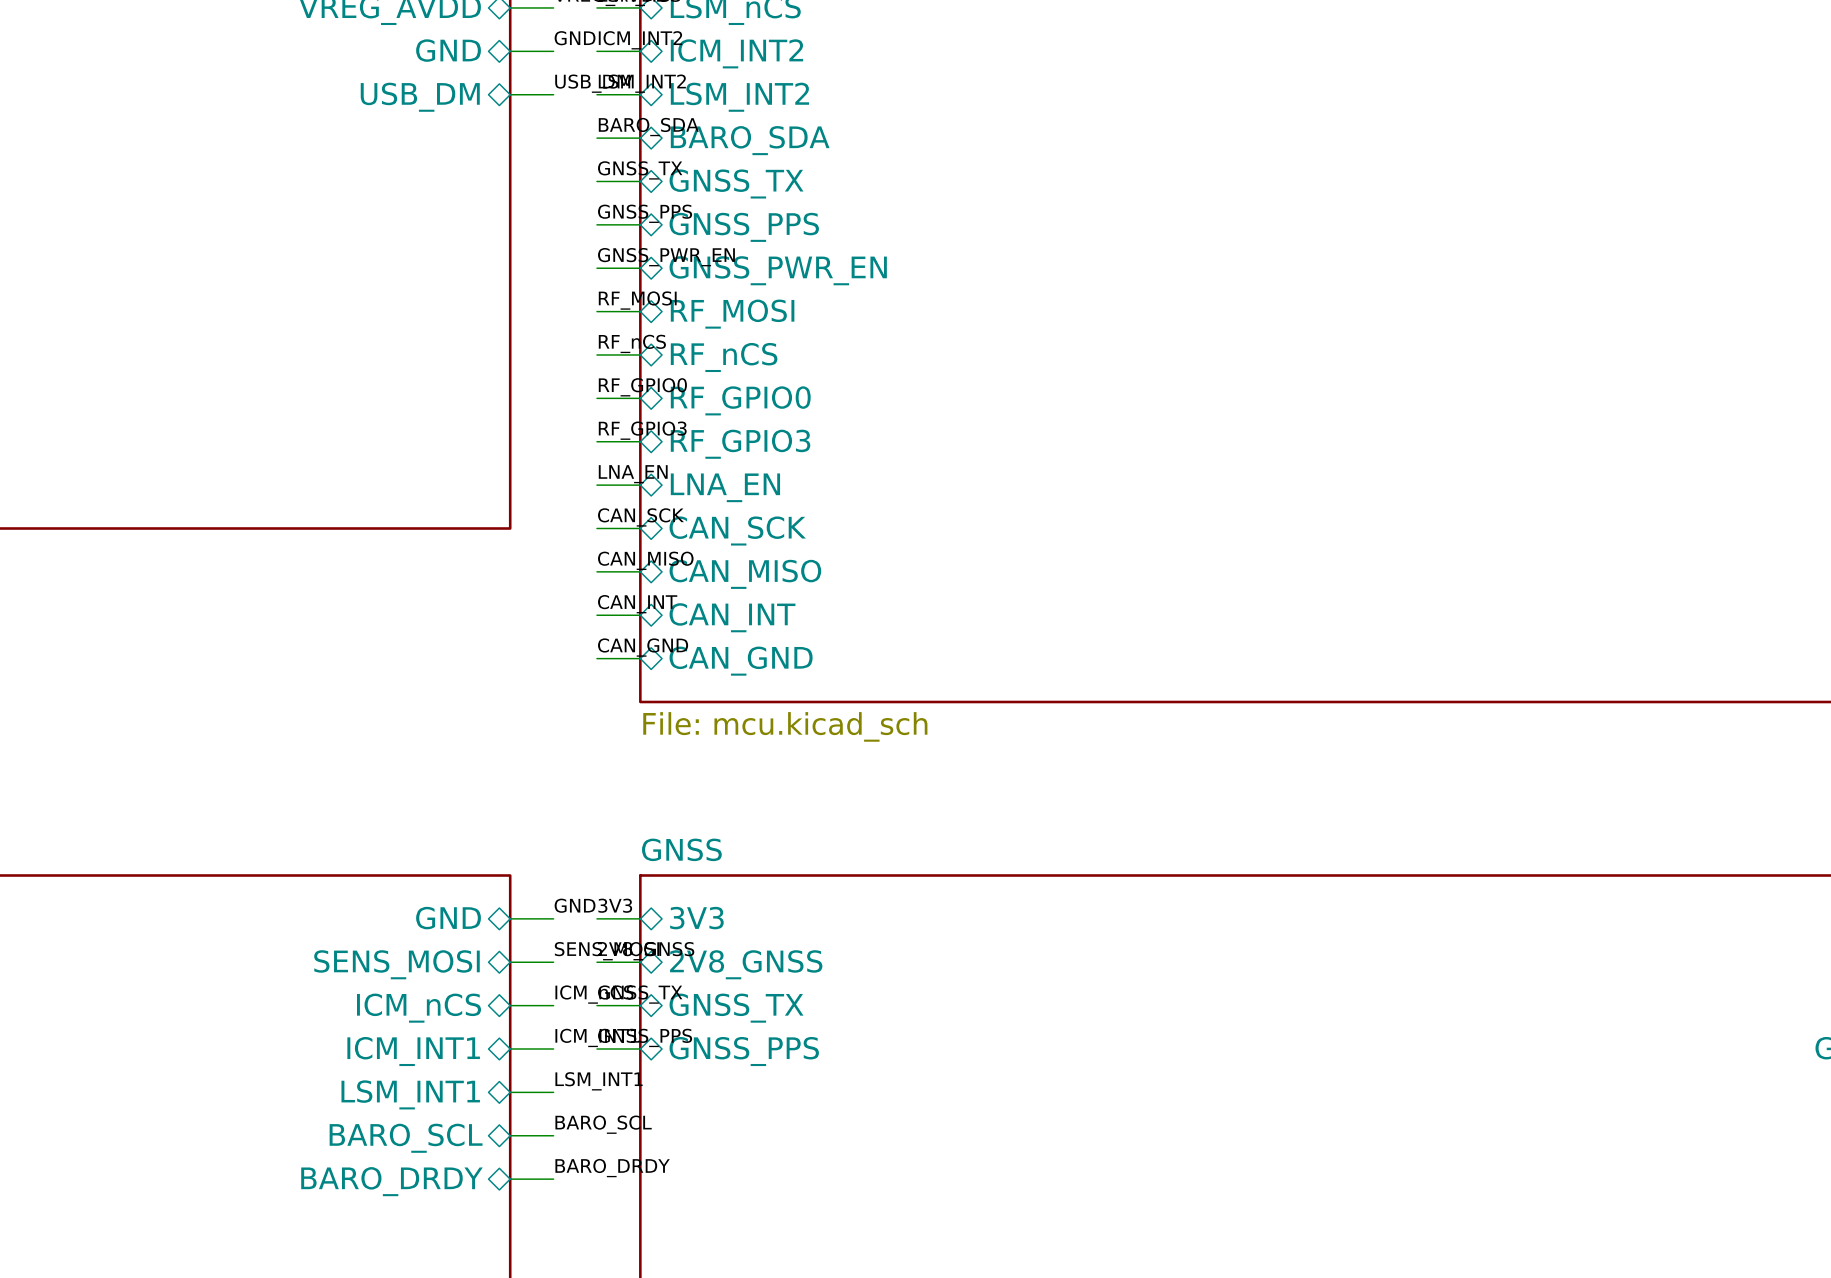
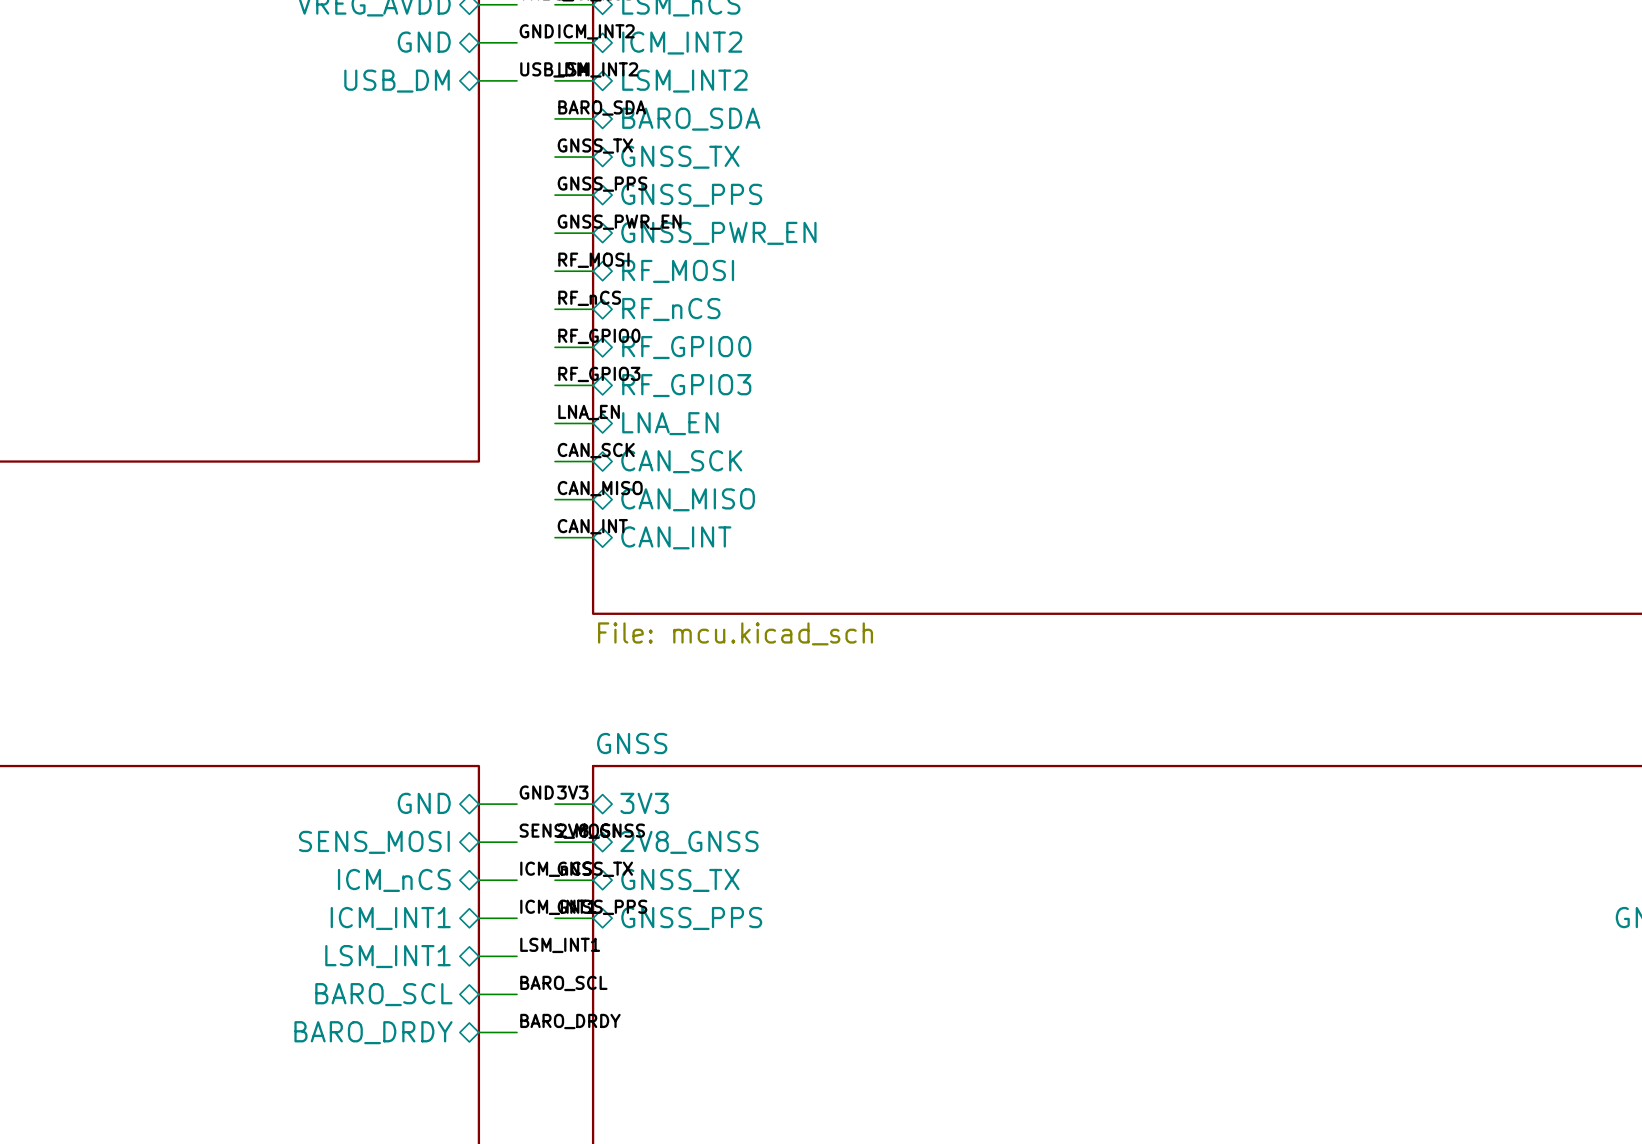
label: CAN_GND (643, 647) -> none
wire: (596, 658) (640, 658) -> none
sheet pin: CAN_GND (741, 661) -> none

